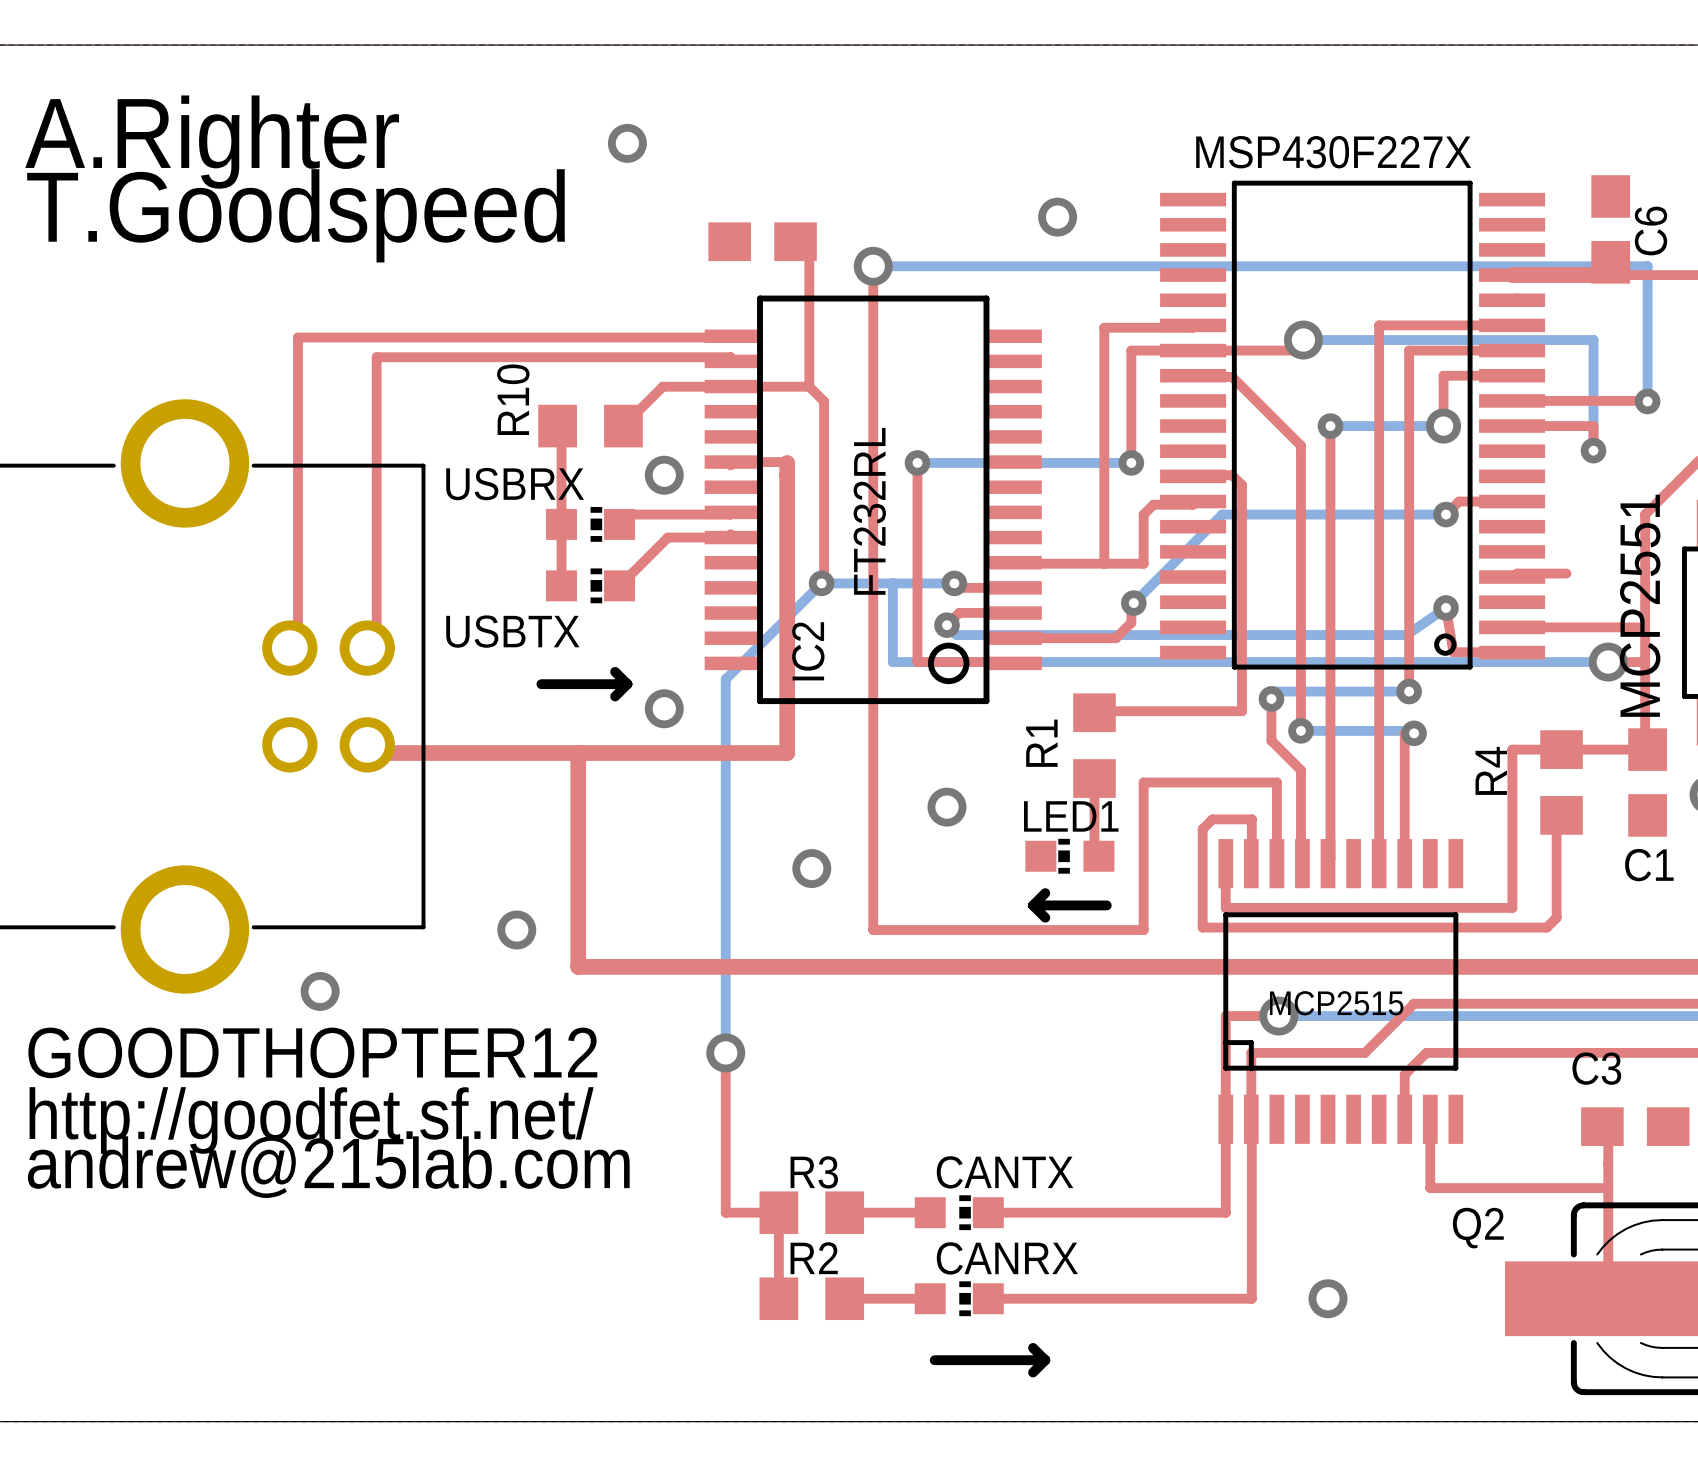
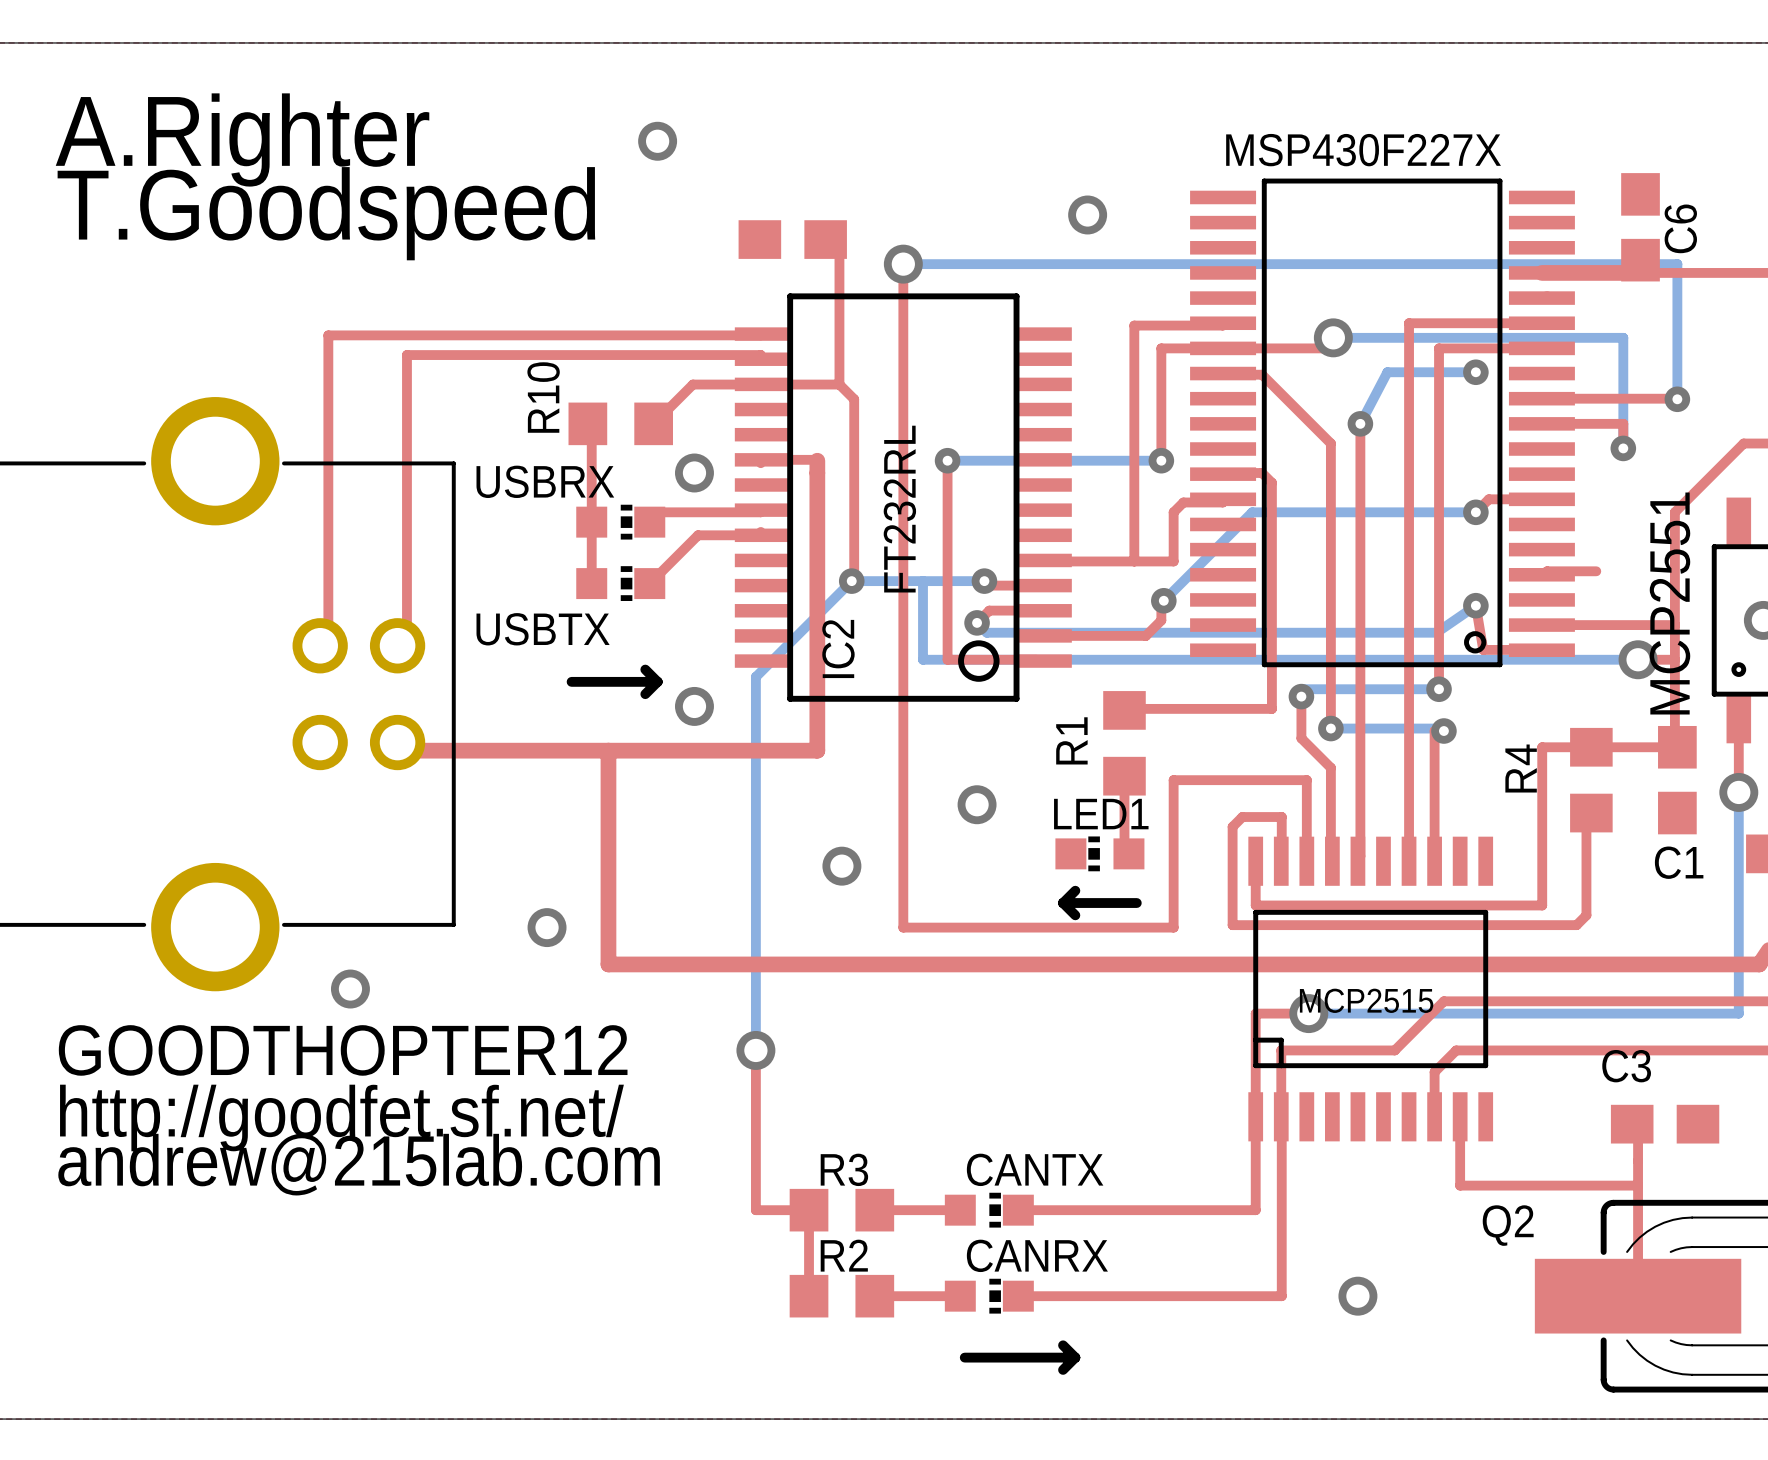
via: none -> (1475, 372)
top track: (1512, 375) (1443, 375) (1443, 426) -> none
bottom track: (1330, 426) (1443, 426) -> (1360, 423) (1387, 372) (1475, 372)
via: (1443, 426) -> none

